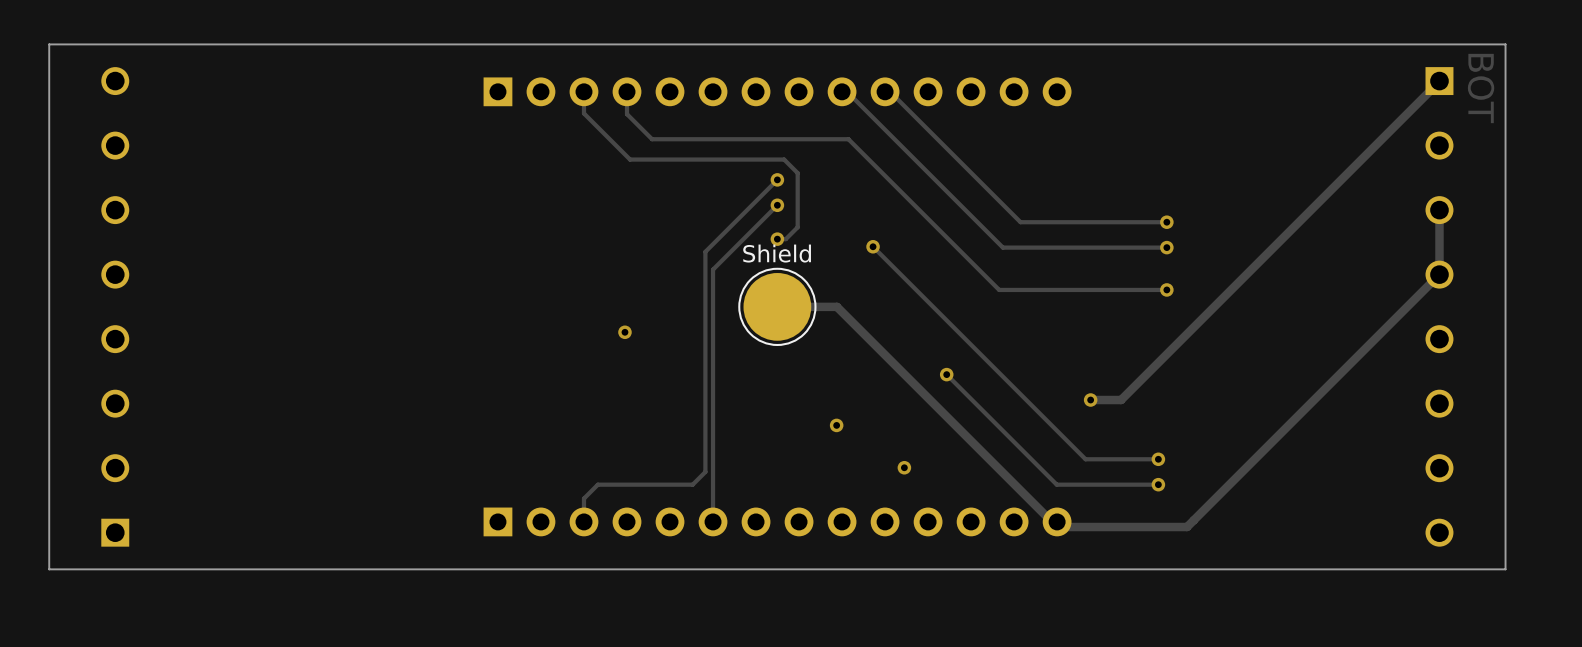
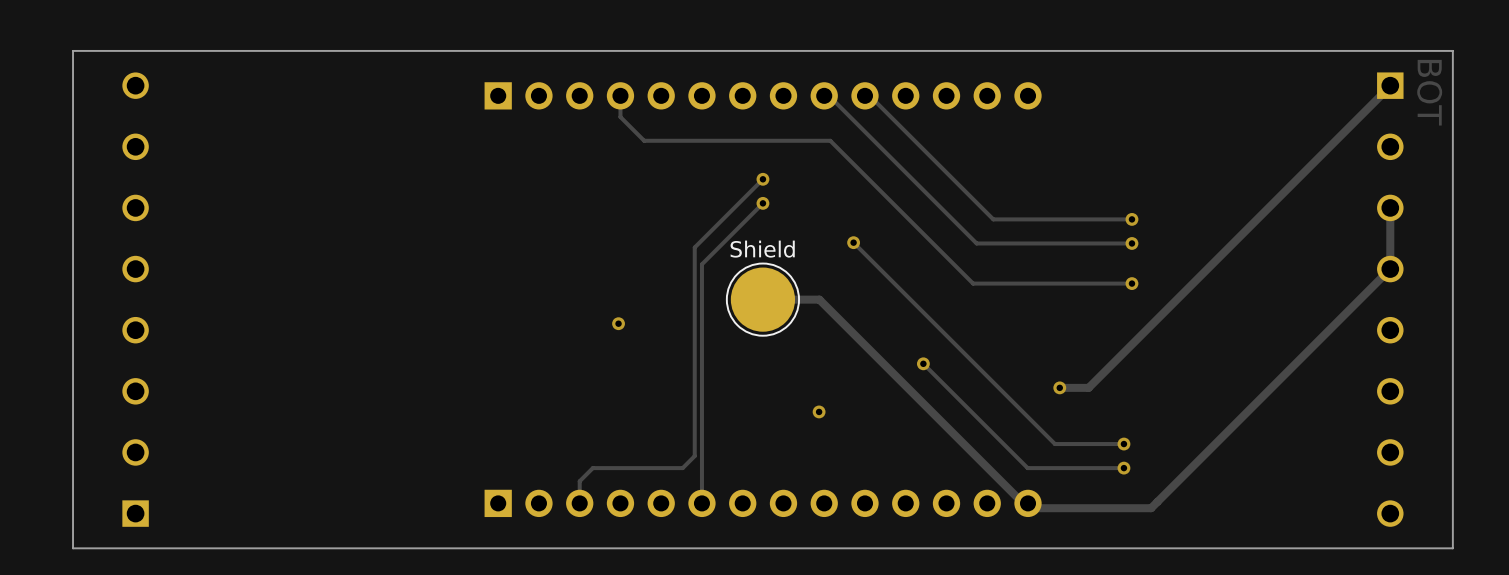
track: (583, 91) (583, 113) (630, 159) (784, 159) (797, 173) (797, 227) (785, 239) (777, 239) -> none
via: (777, 239) -> none
via: (904, 467) -> none

